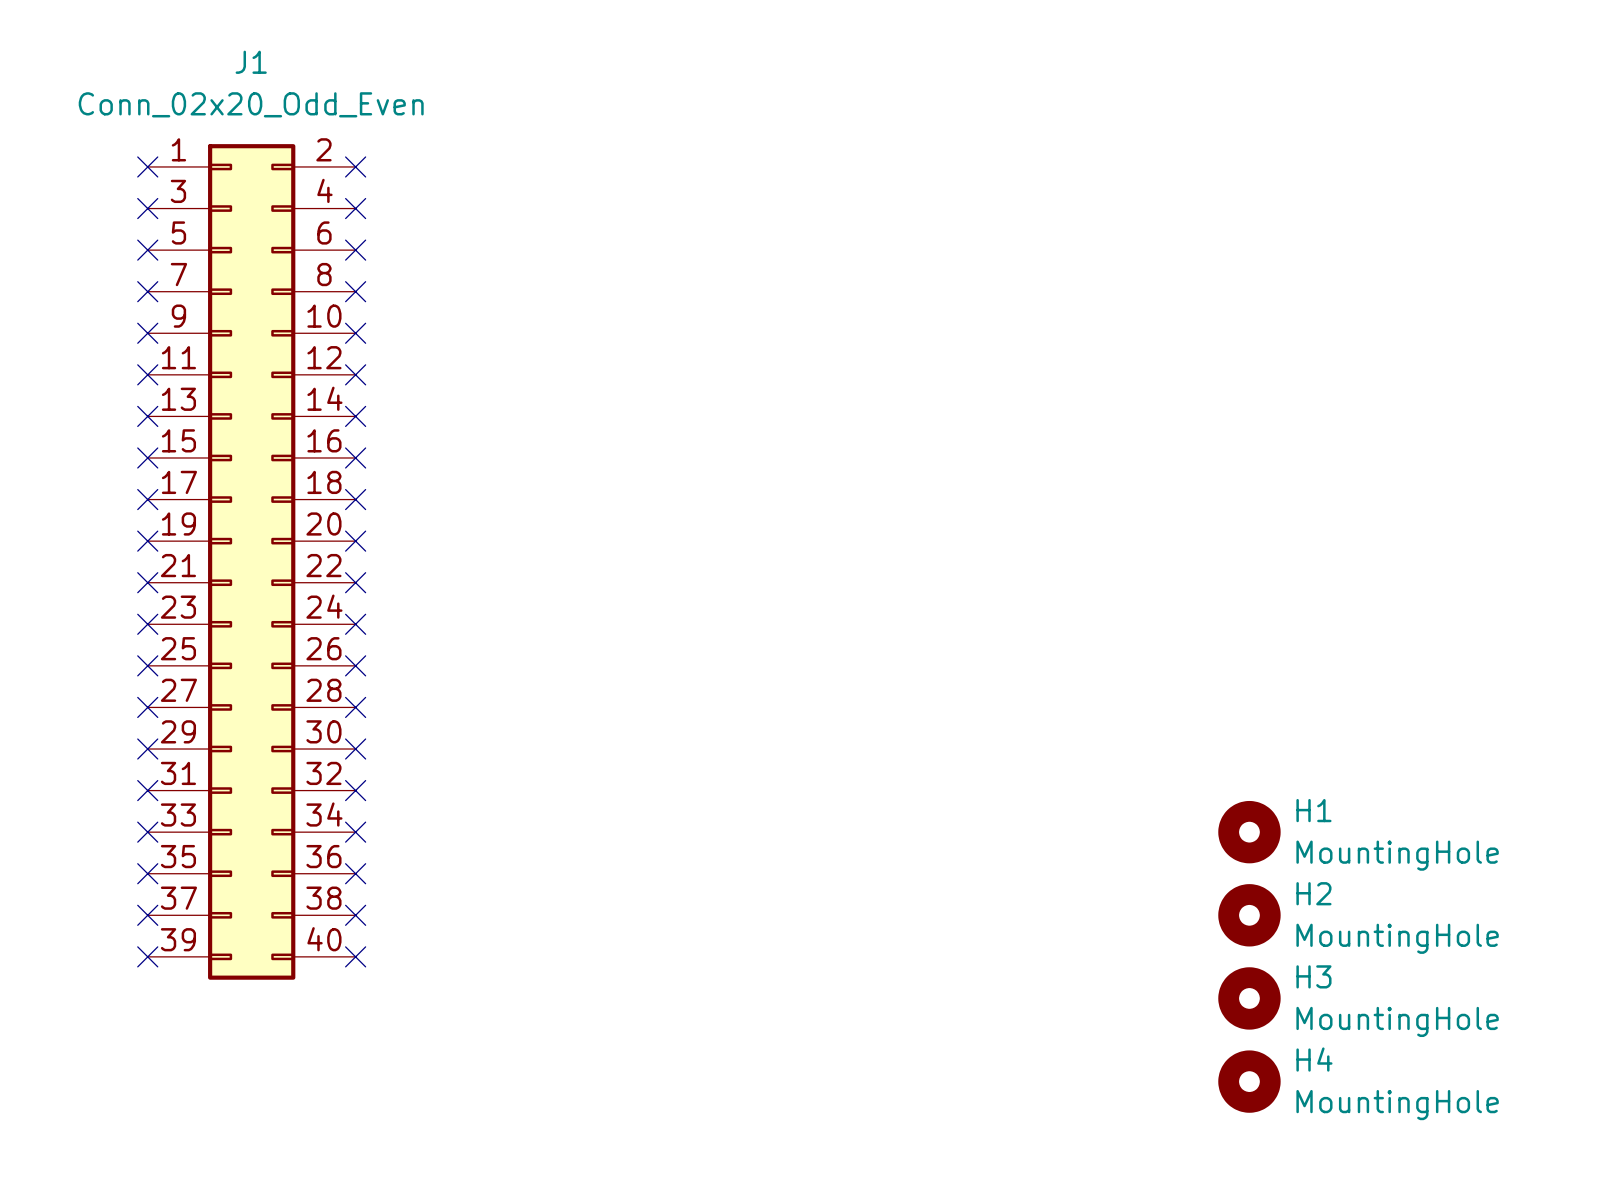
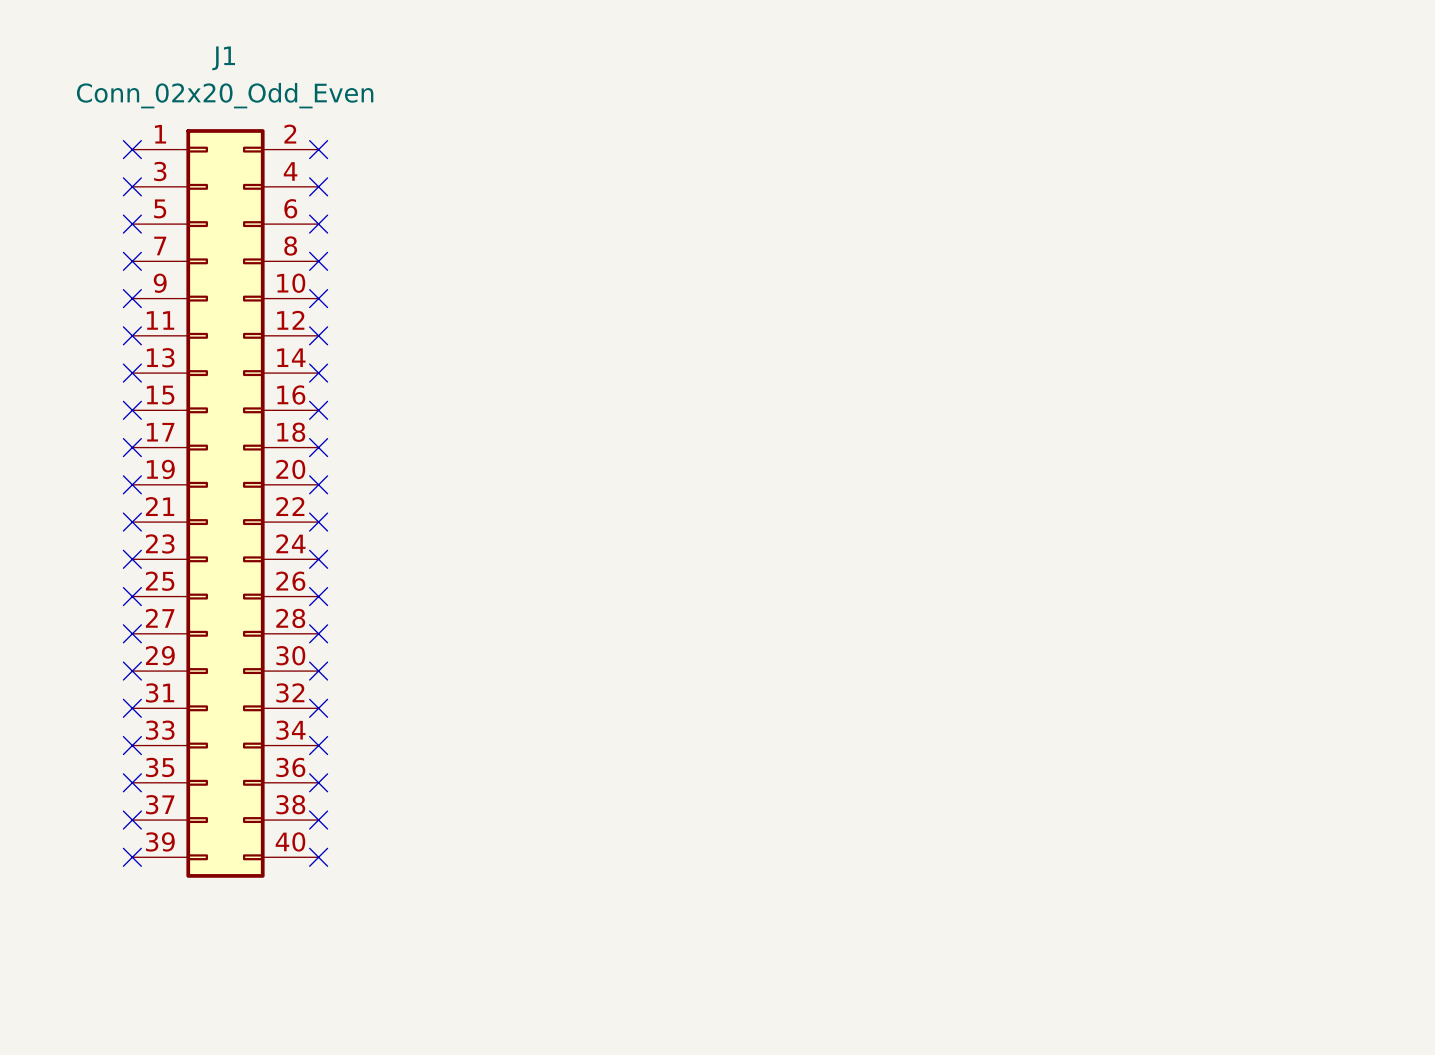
H1: MountingHole (1249, 832) -> none
H2: MountingHole (1249, 915) -> none
H3: MountingHole (1249, 998) -> none
H4: MountingHole (1249, 1081) -> none

